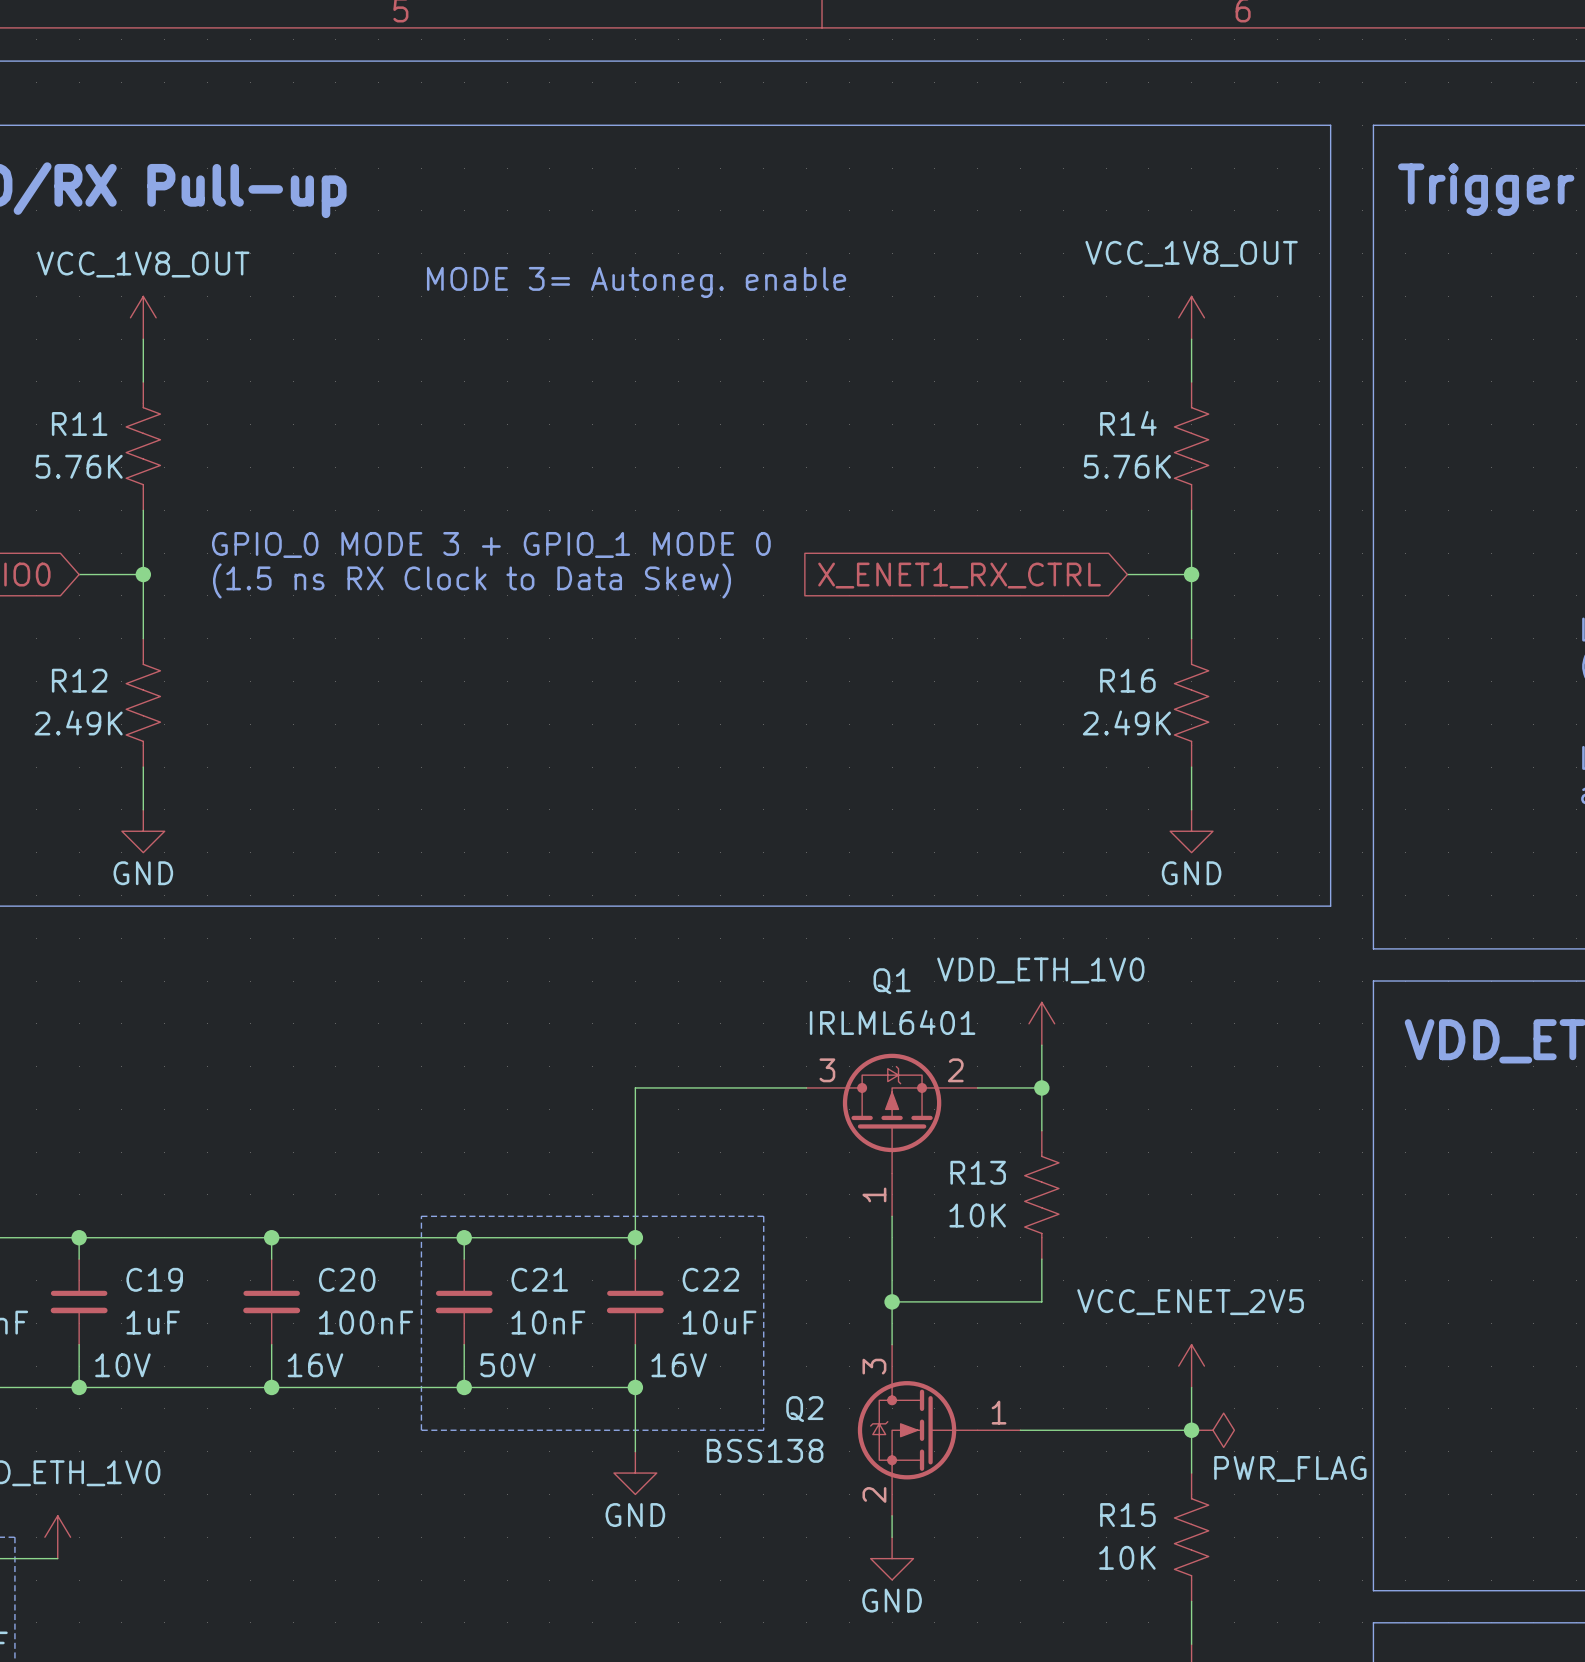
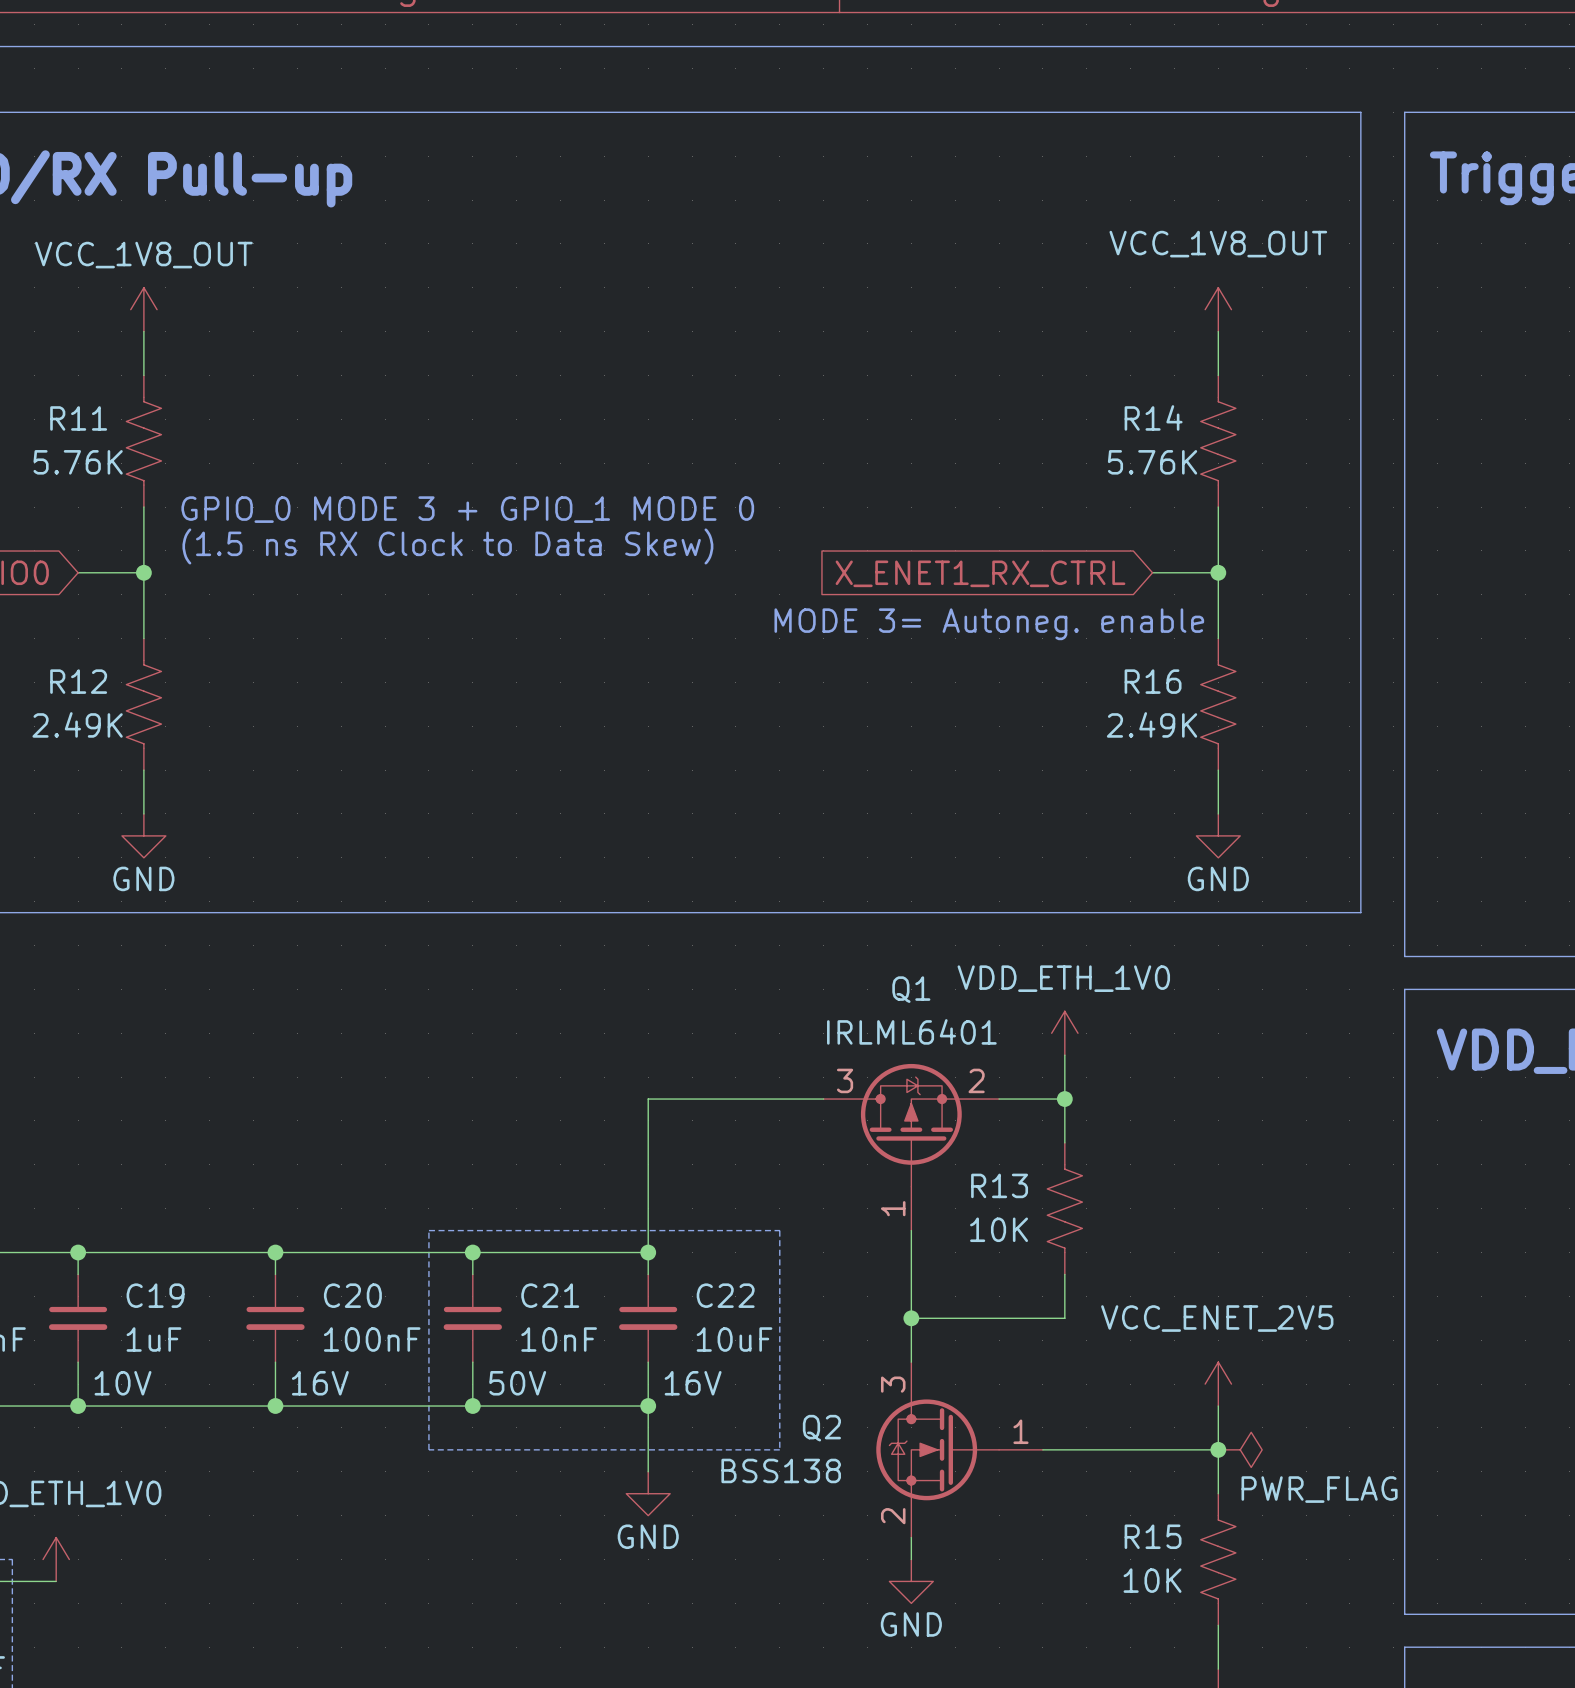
text: MODE 3= Autoneg. enable (636, 282) -> none
text position: GPIO_0 MODE 3 + GPIO_1 MODE 0 (491, 544) -> GPIO_0 MODE 3 + GPIO_1 MODE 0 (467, 509)
text position: (1.5 ns RX Clock to Data Skew) (472, 580) -> (1.5 ns RX Clock to Data Skew) (447, 546)
text: none -> MODE 3= Autoneg. enable (989, 624)

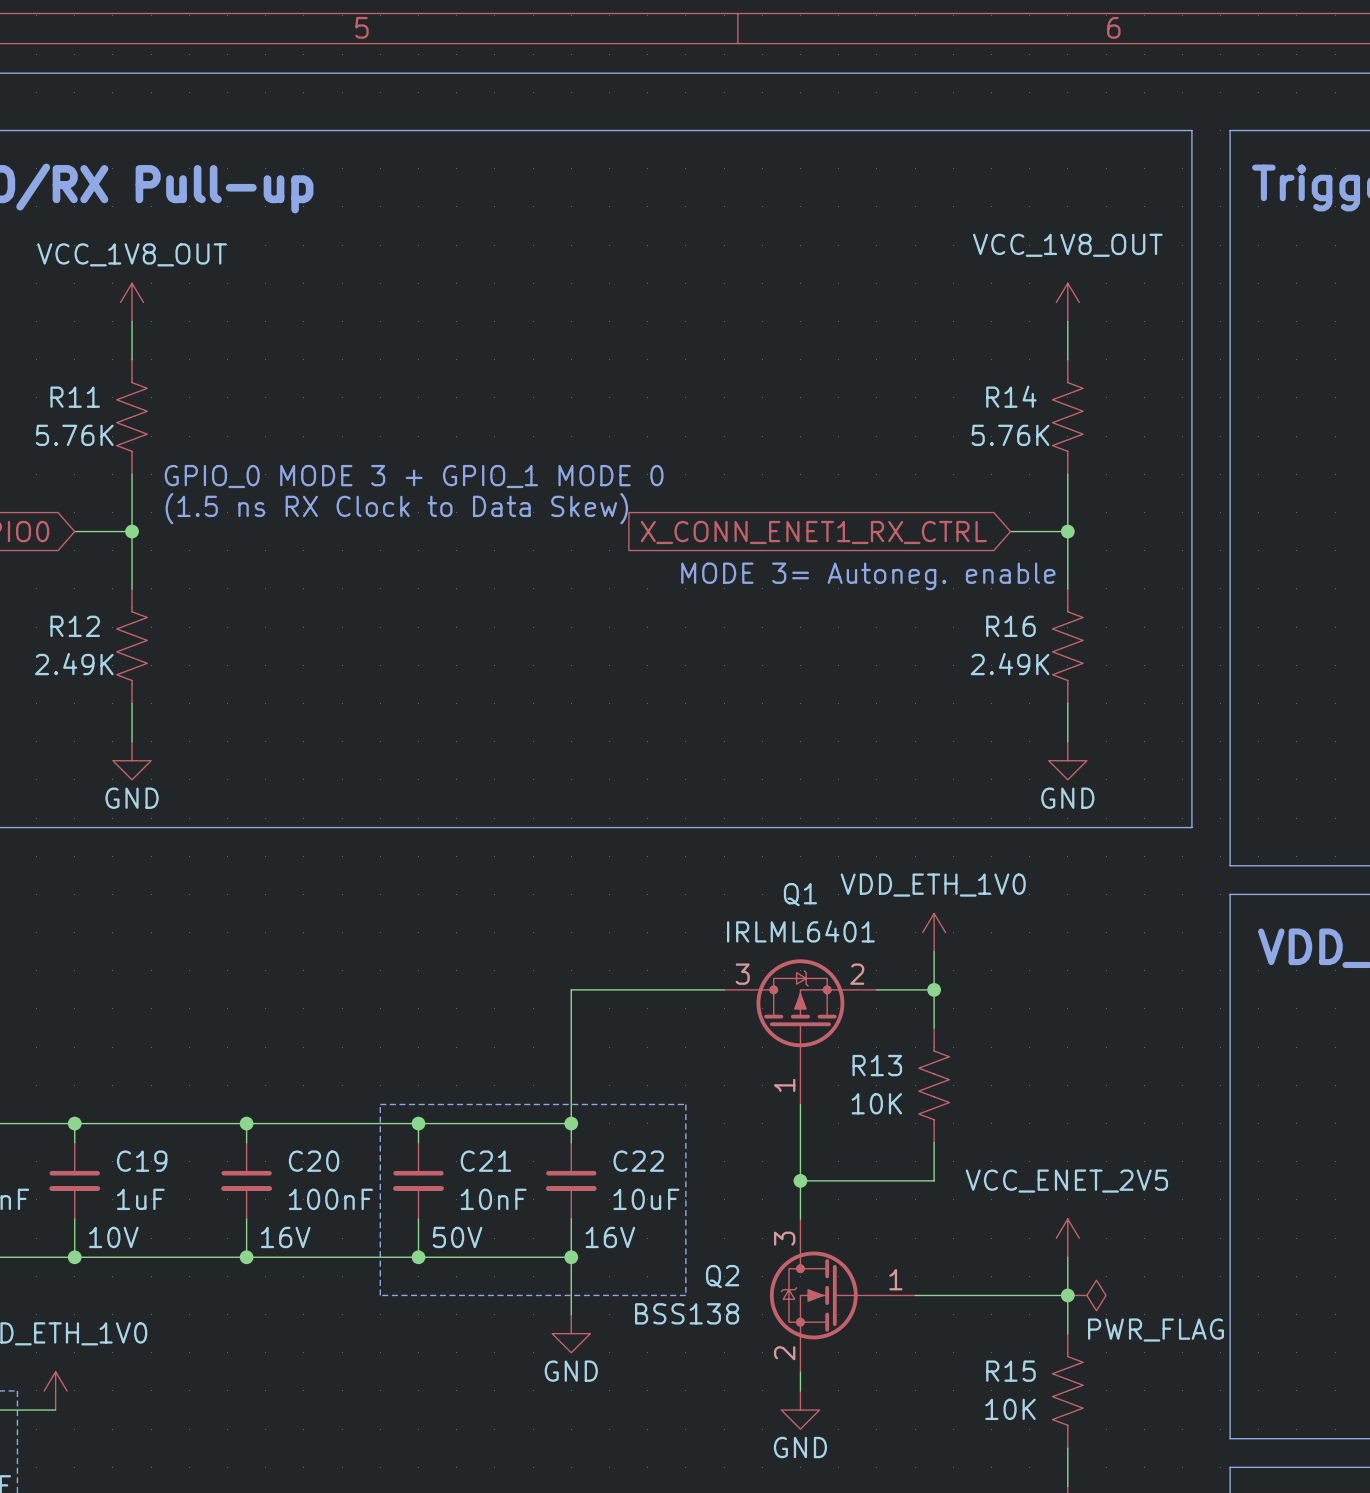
global label: X_ENET1_RX_CTRL (980, 573) -> X_CONN_ENET1_RX_CTRL (813, 532)

